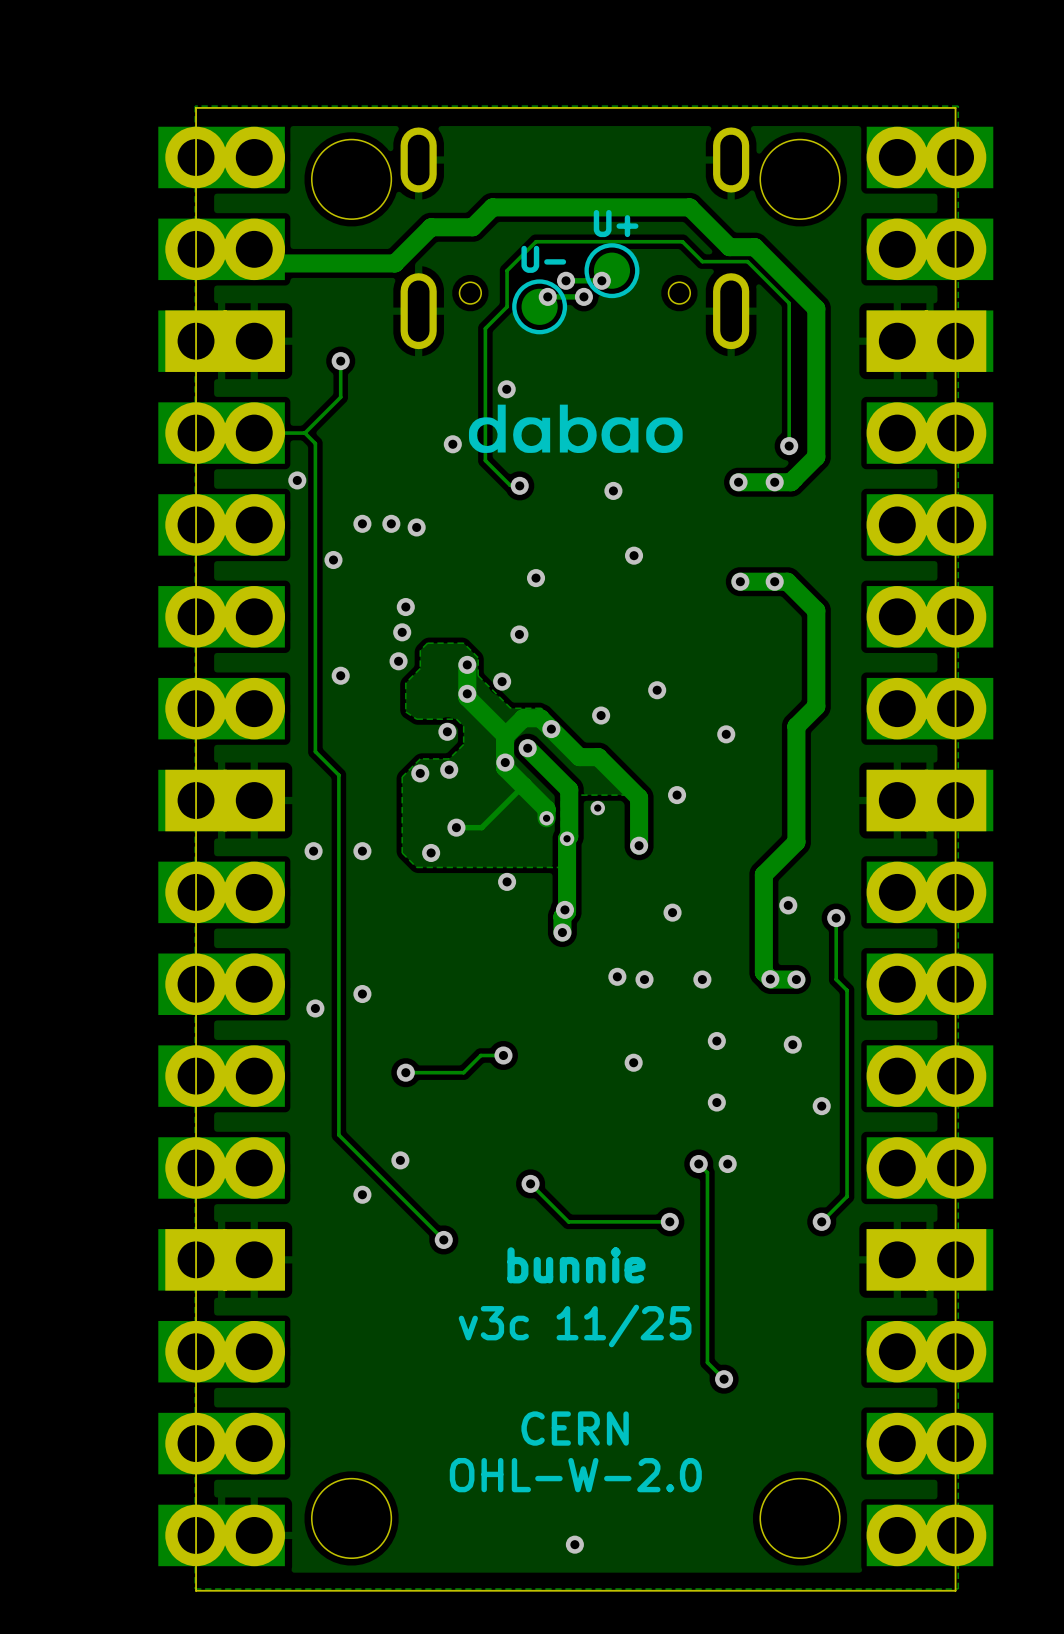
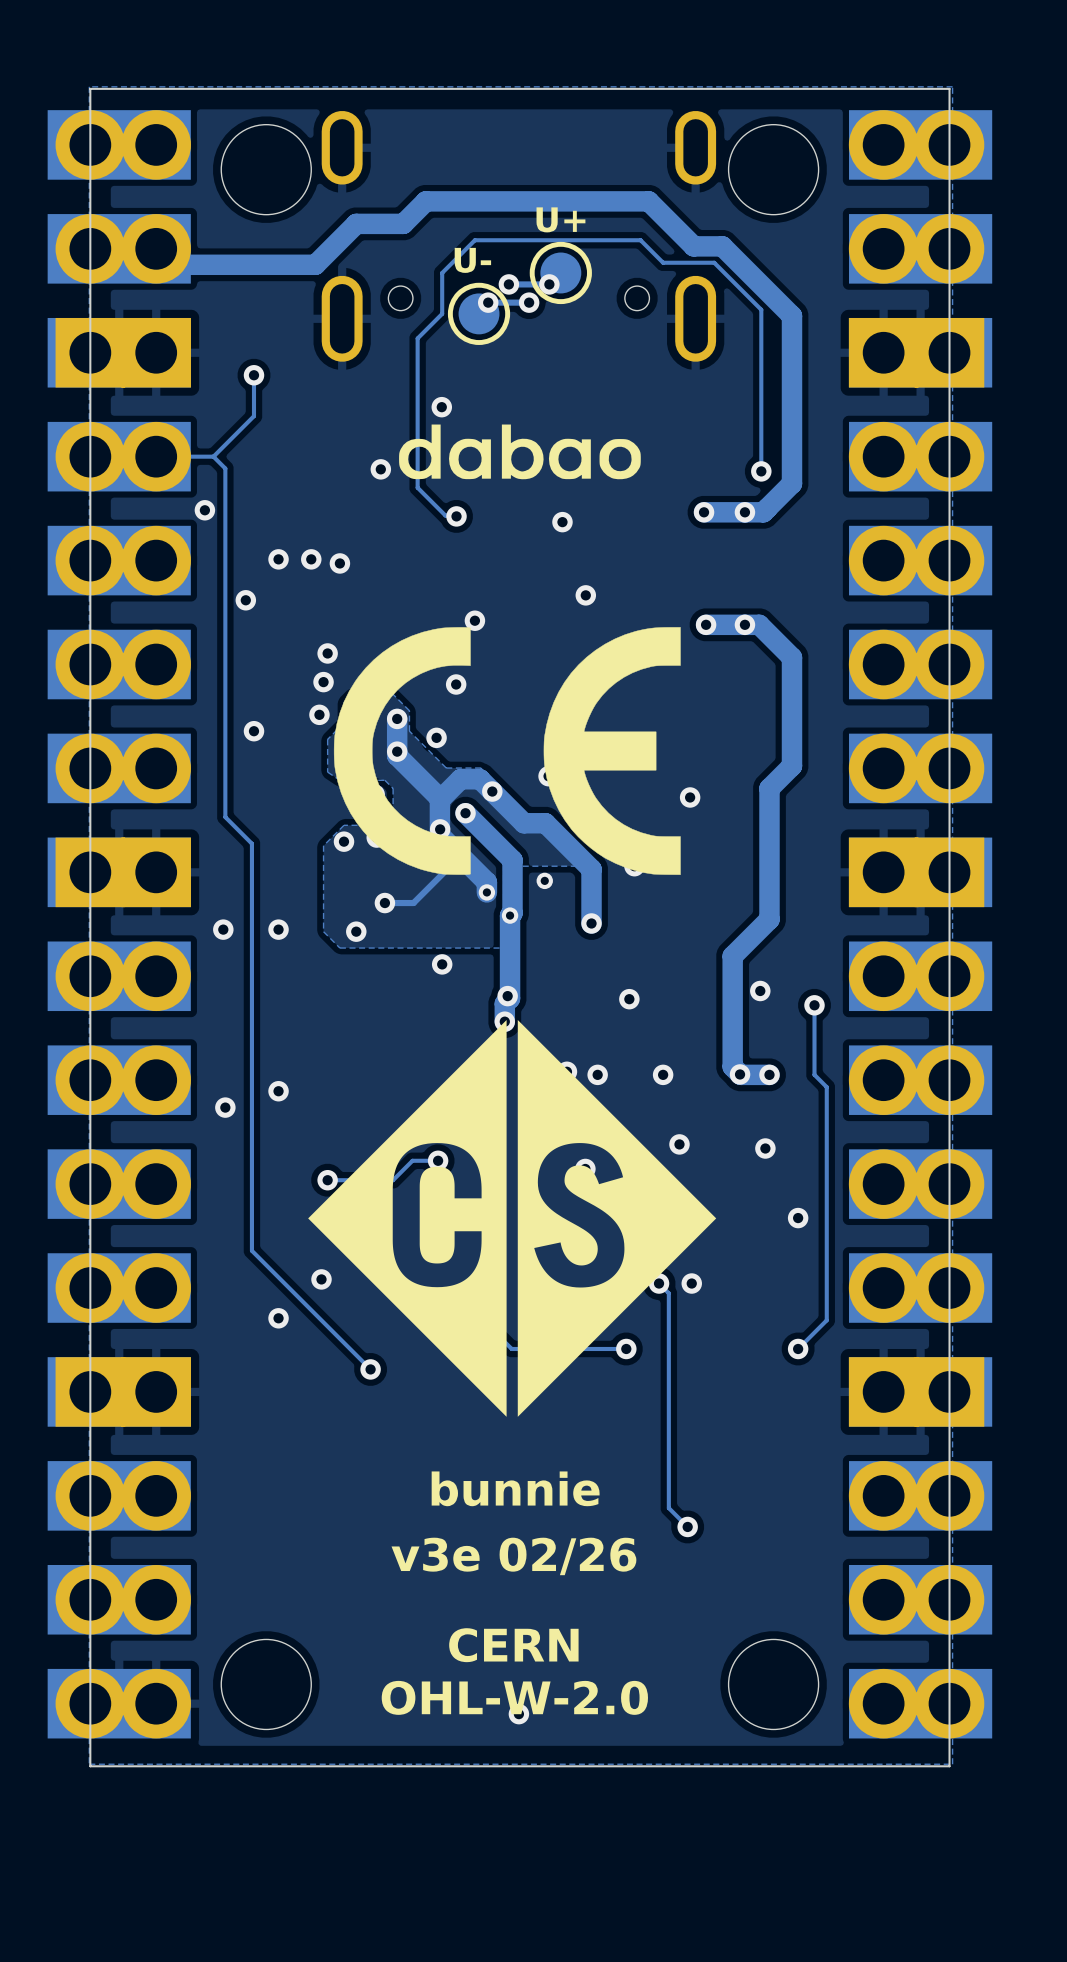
drawing: none -> [333, 627, 681, 875]
drawing: none -> [308, 1019, 717, 1417]
text: bunnie (576, 1265) -> none
text: v3c 11/25 (575, 1325) -> bunnie (515, 1488)
text: CERN (575, 1428) -> v3e 02/26 (513, 1556)
text: OHL-W-2.0 (575, 1475) -> CERN (513, 1645)
text: none -> OHL-W-2.0 (514, 1697)

